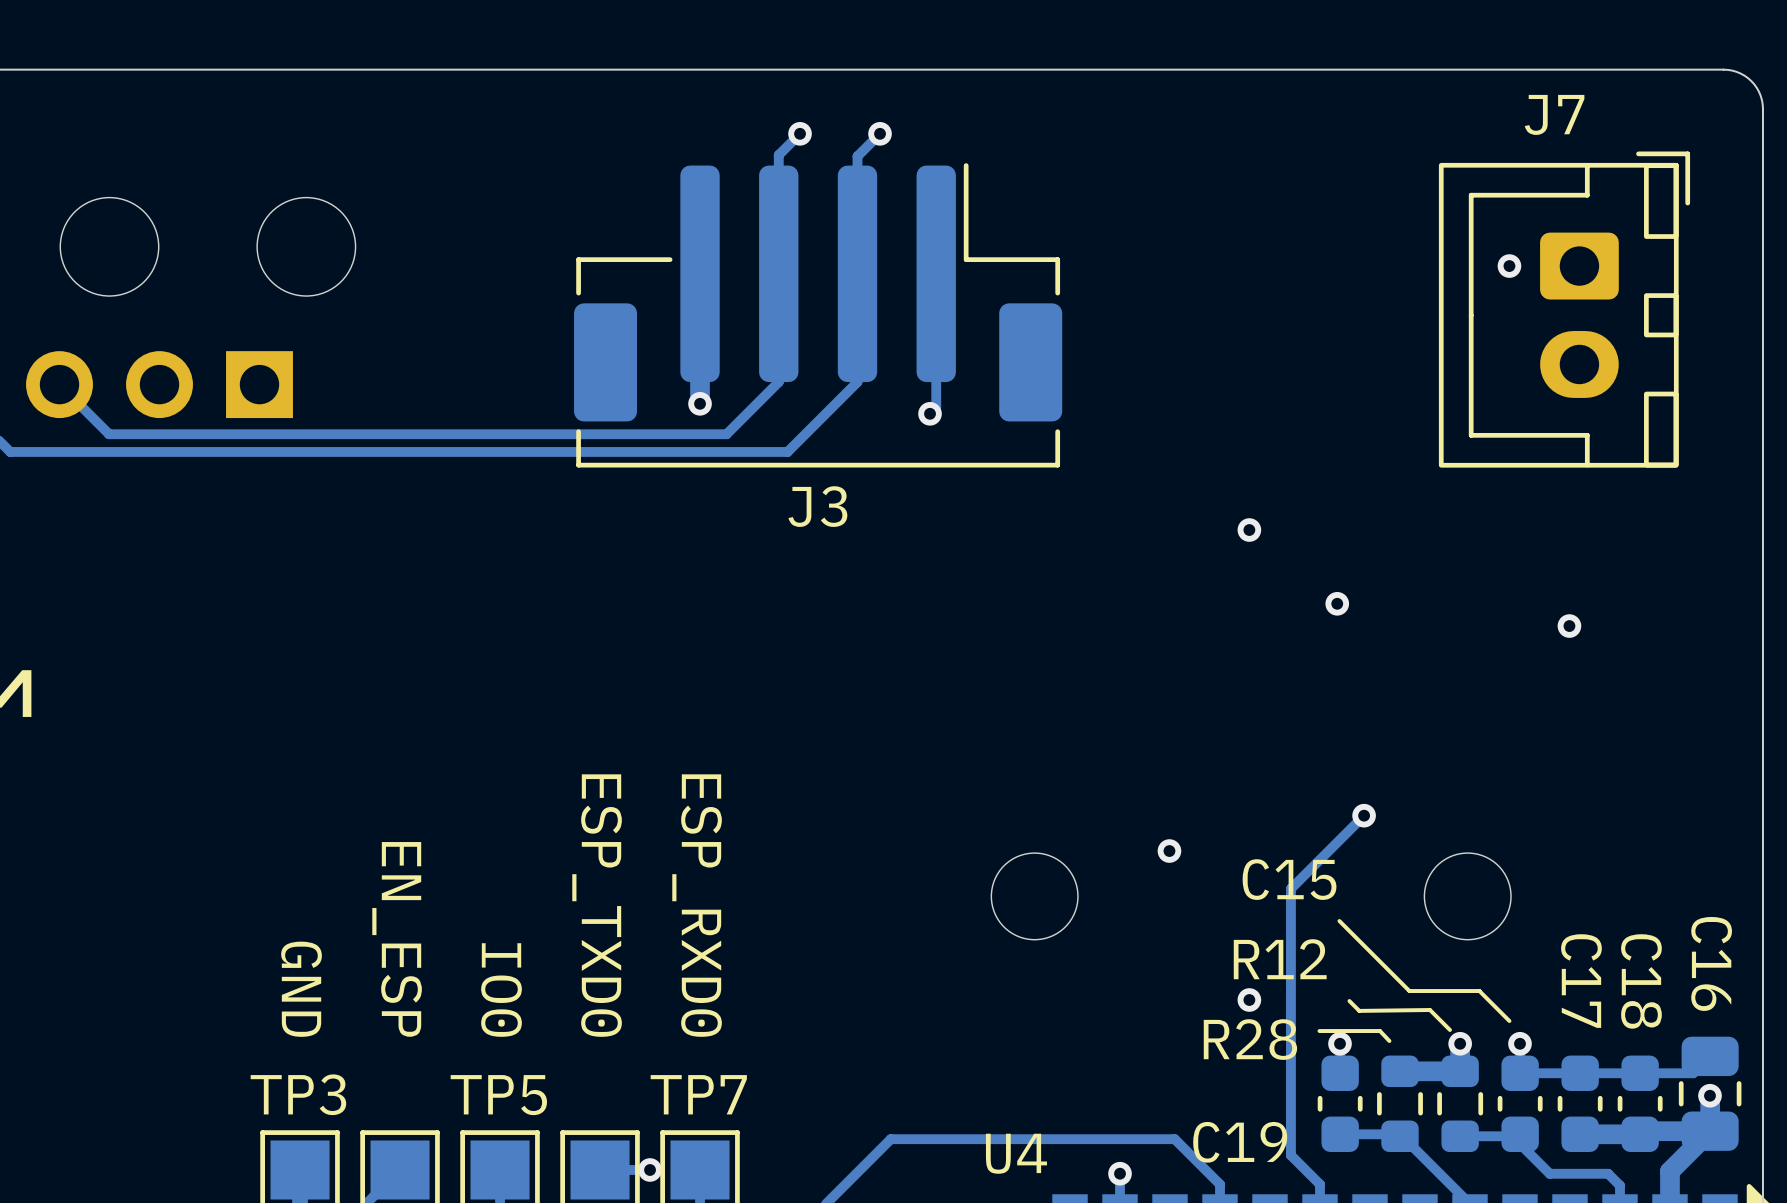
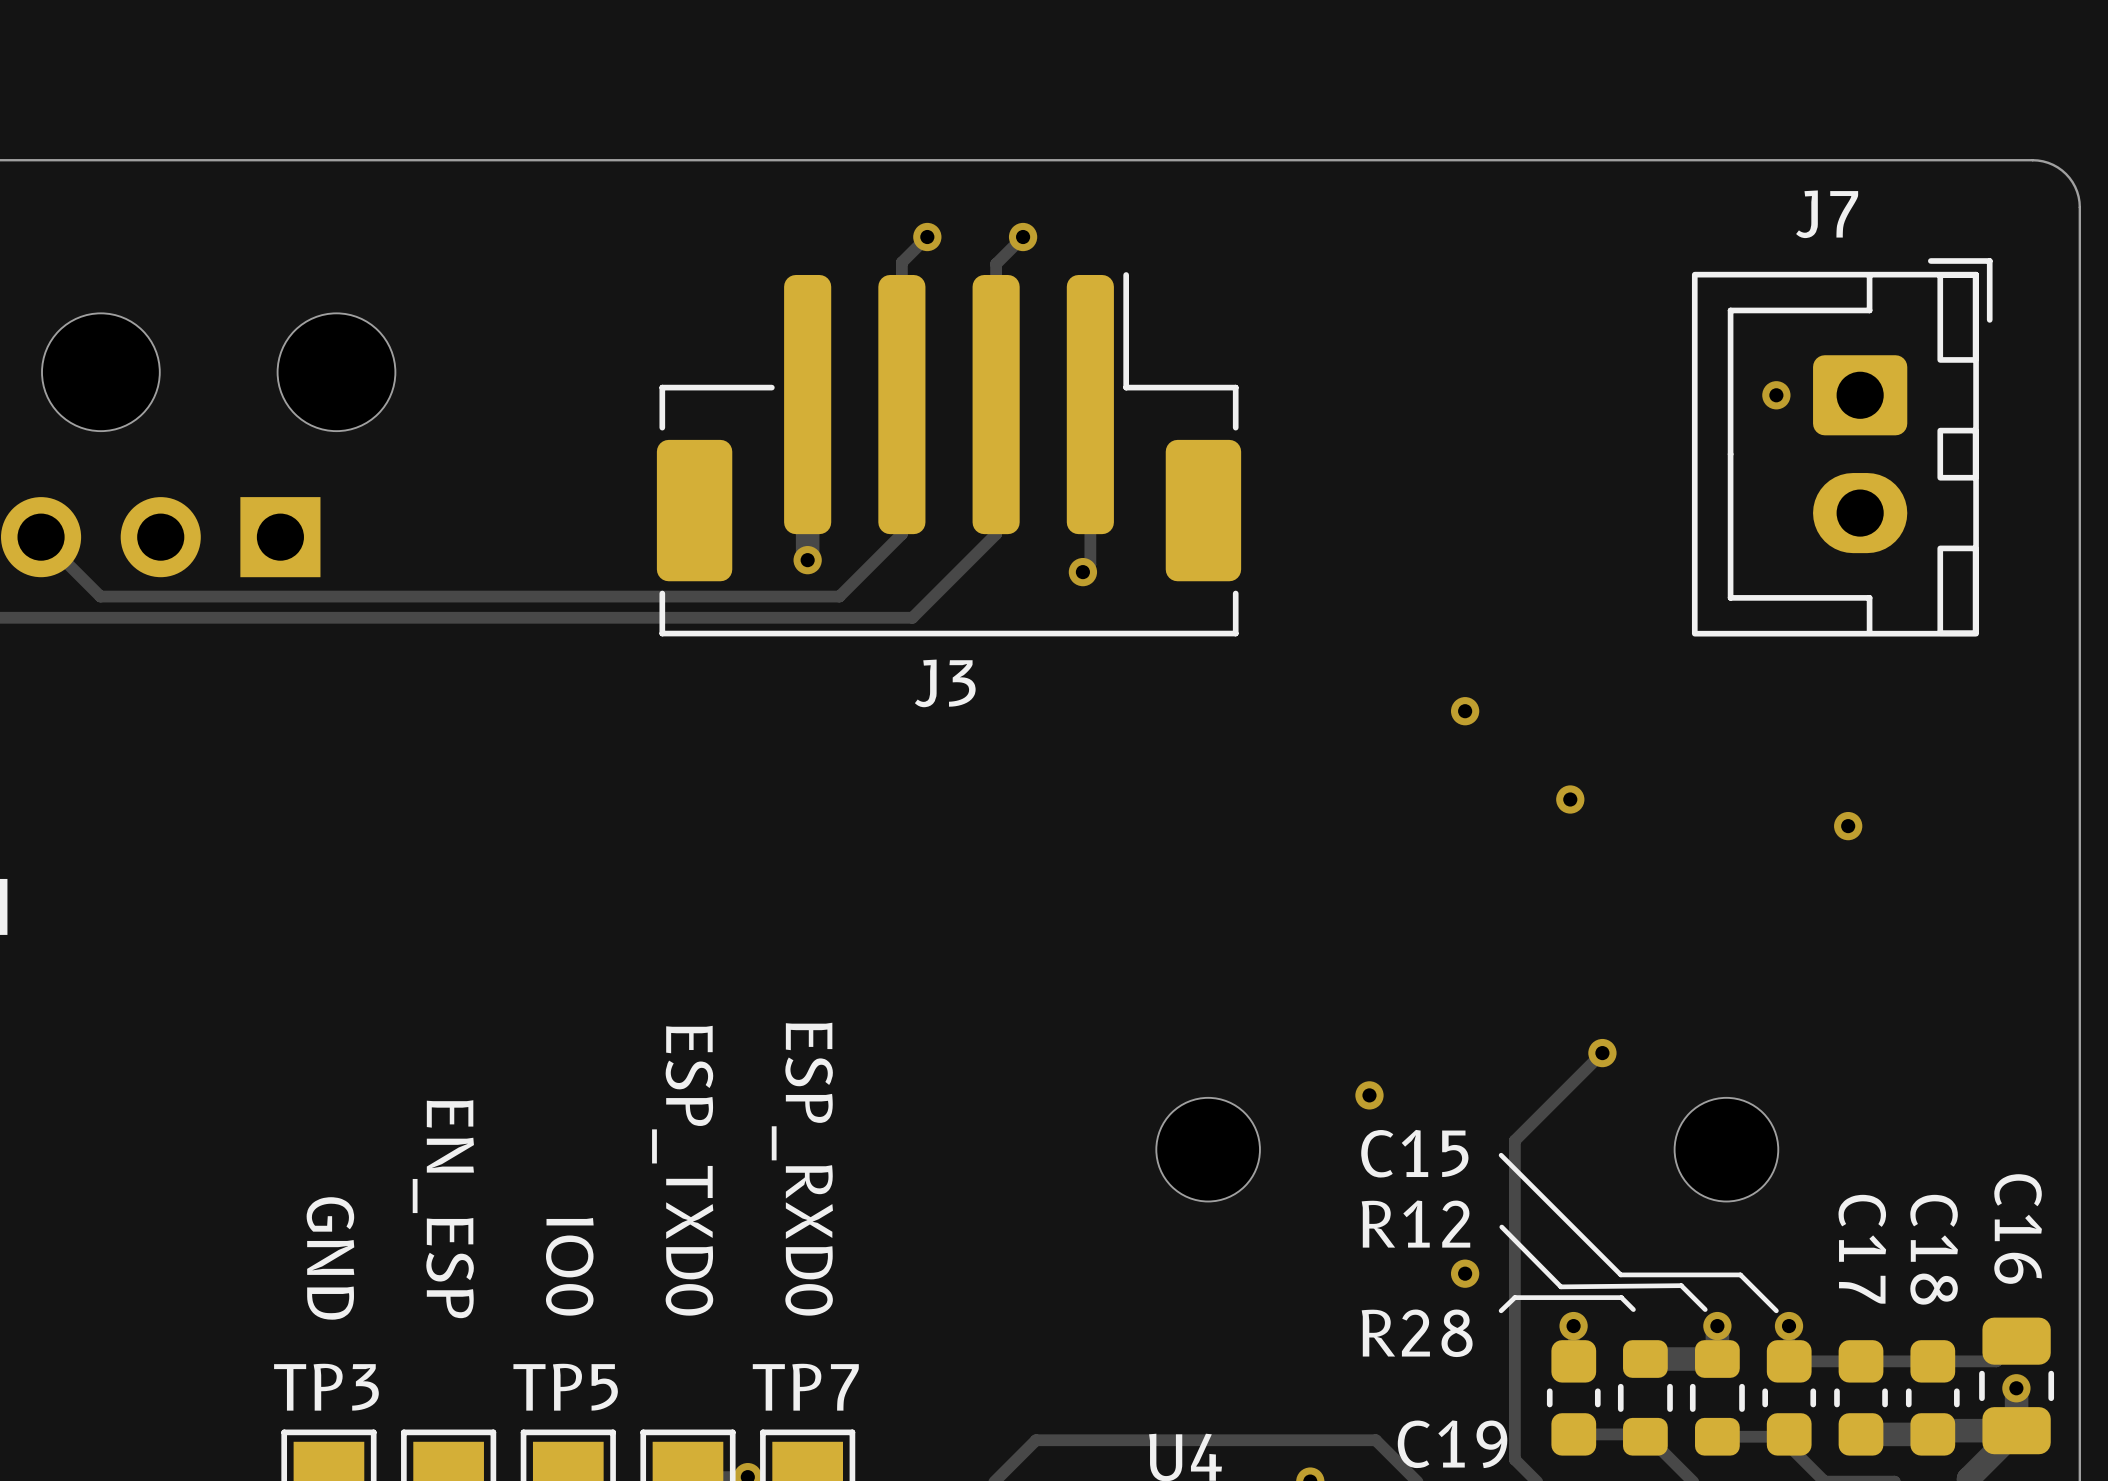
C15 name position: C15 (1289, 879) -> C15 (1414, 1153)
line: none -> (1501, 1155) (1620, 1274) (1740, 1274) (1776, 1310)
line: (1339, 921) (1409, 991) (1479, 991) (1509, 1021) -> none
R12 name position: R12 (1280, 959) -> R12 (1415, 1224)
line: (1349, 1001) (1359, 1011) (1429, 1010) -> (1501, 1227) (1560, 1286) (1681, 1285)
line: none -> (1633, 1309) (1621, 1297) (1514, 1297) (1501, 1310)
line: (1319, 1031) (1380, 1031) (1389, 1041) -> none
R28 name position: R28 (1250, 1039) -> R28 (1417, 1333)

